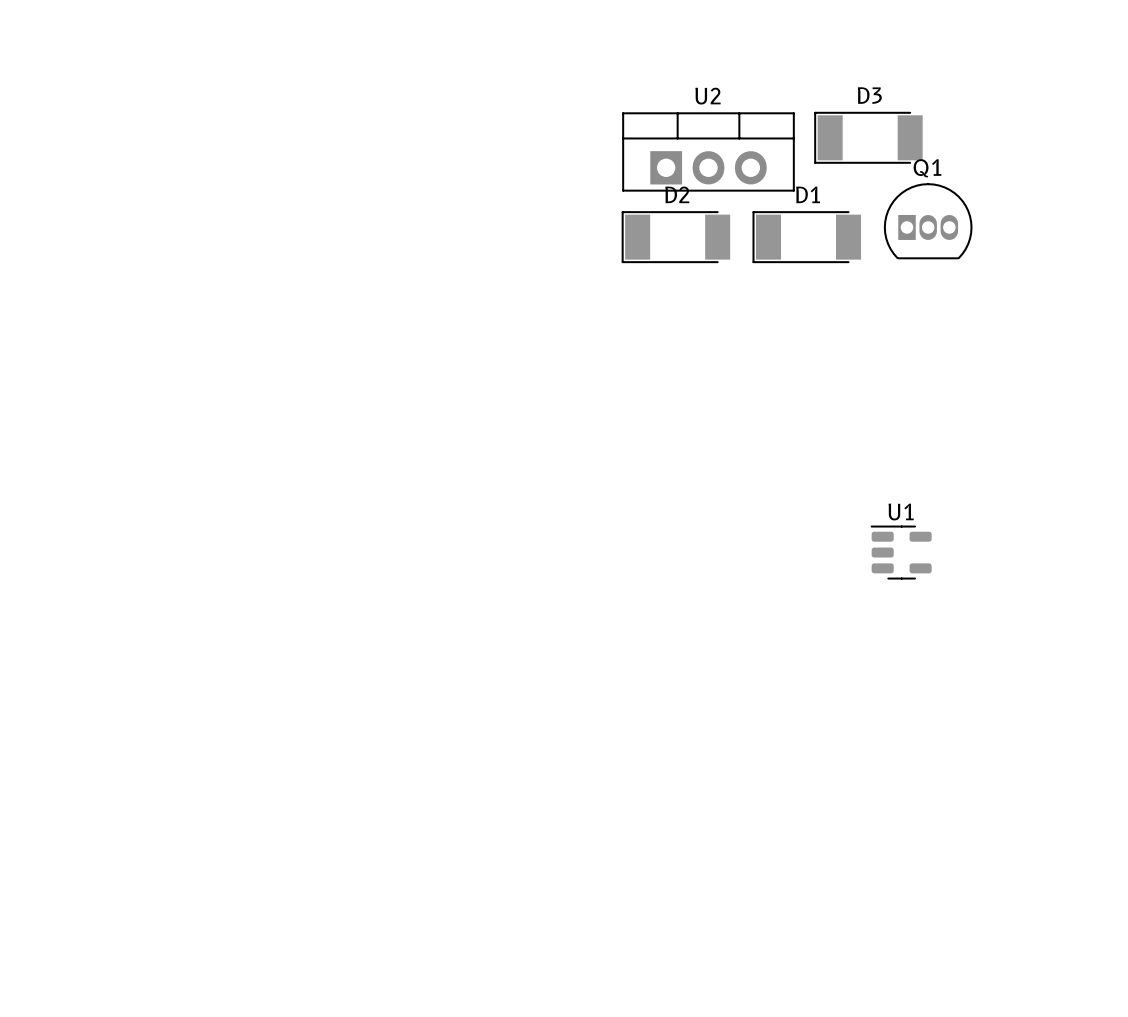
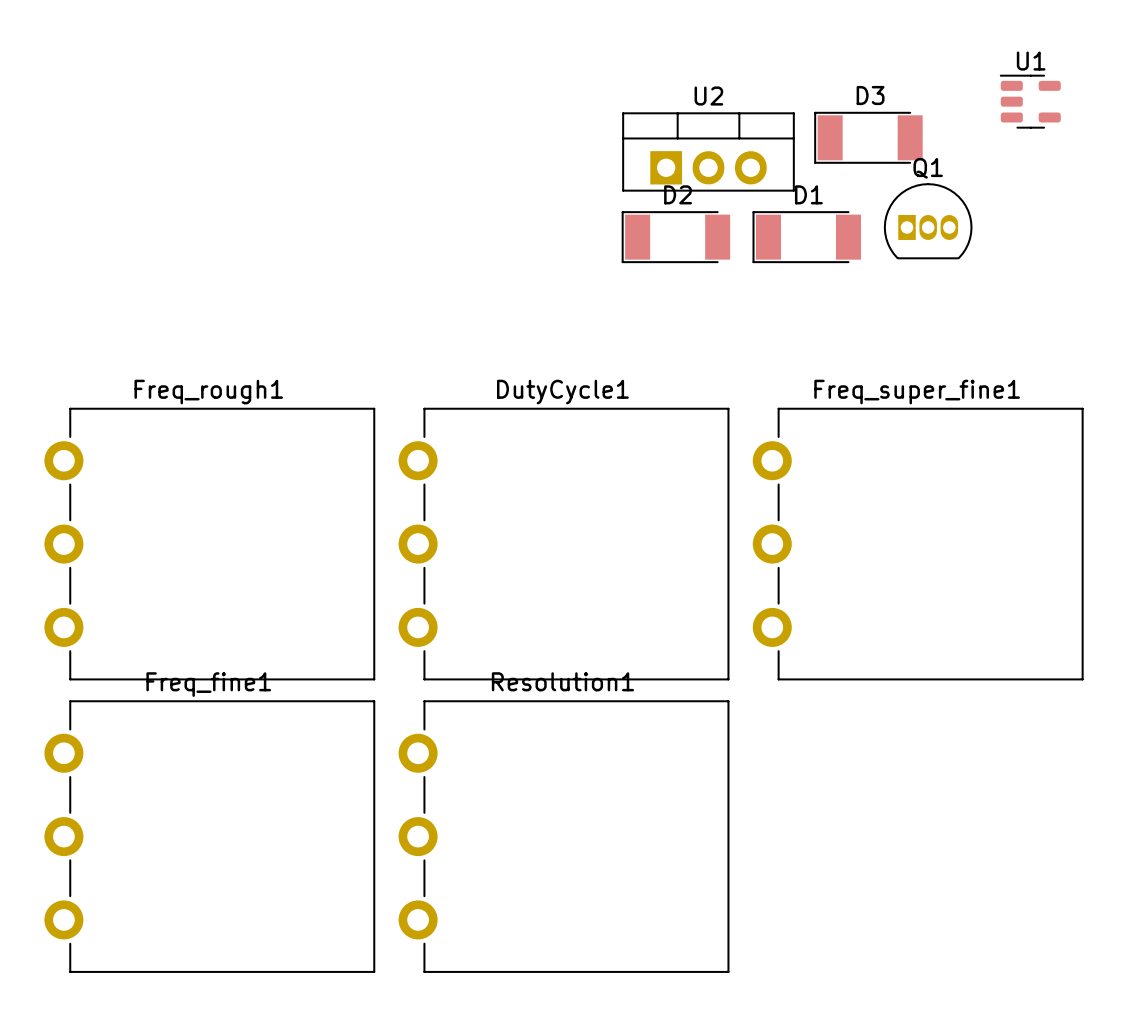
Freq_rough1: none -> (209, 544)
DutyCycle1: none -> (564, 544)
Freq_super_fine1: none -> (918, 544)
U1 position: (901, 552) -> (1030, 101)
Freq_fine1: none -> (209, 836)
Resolution1: none -> (564, 836)

